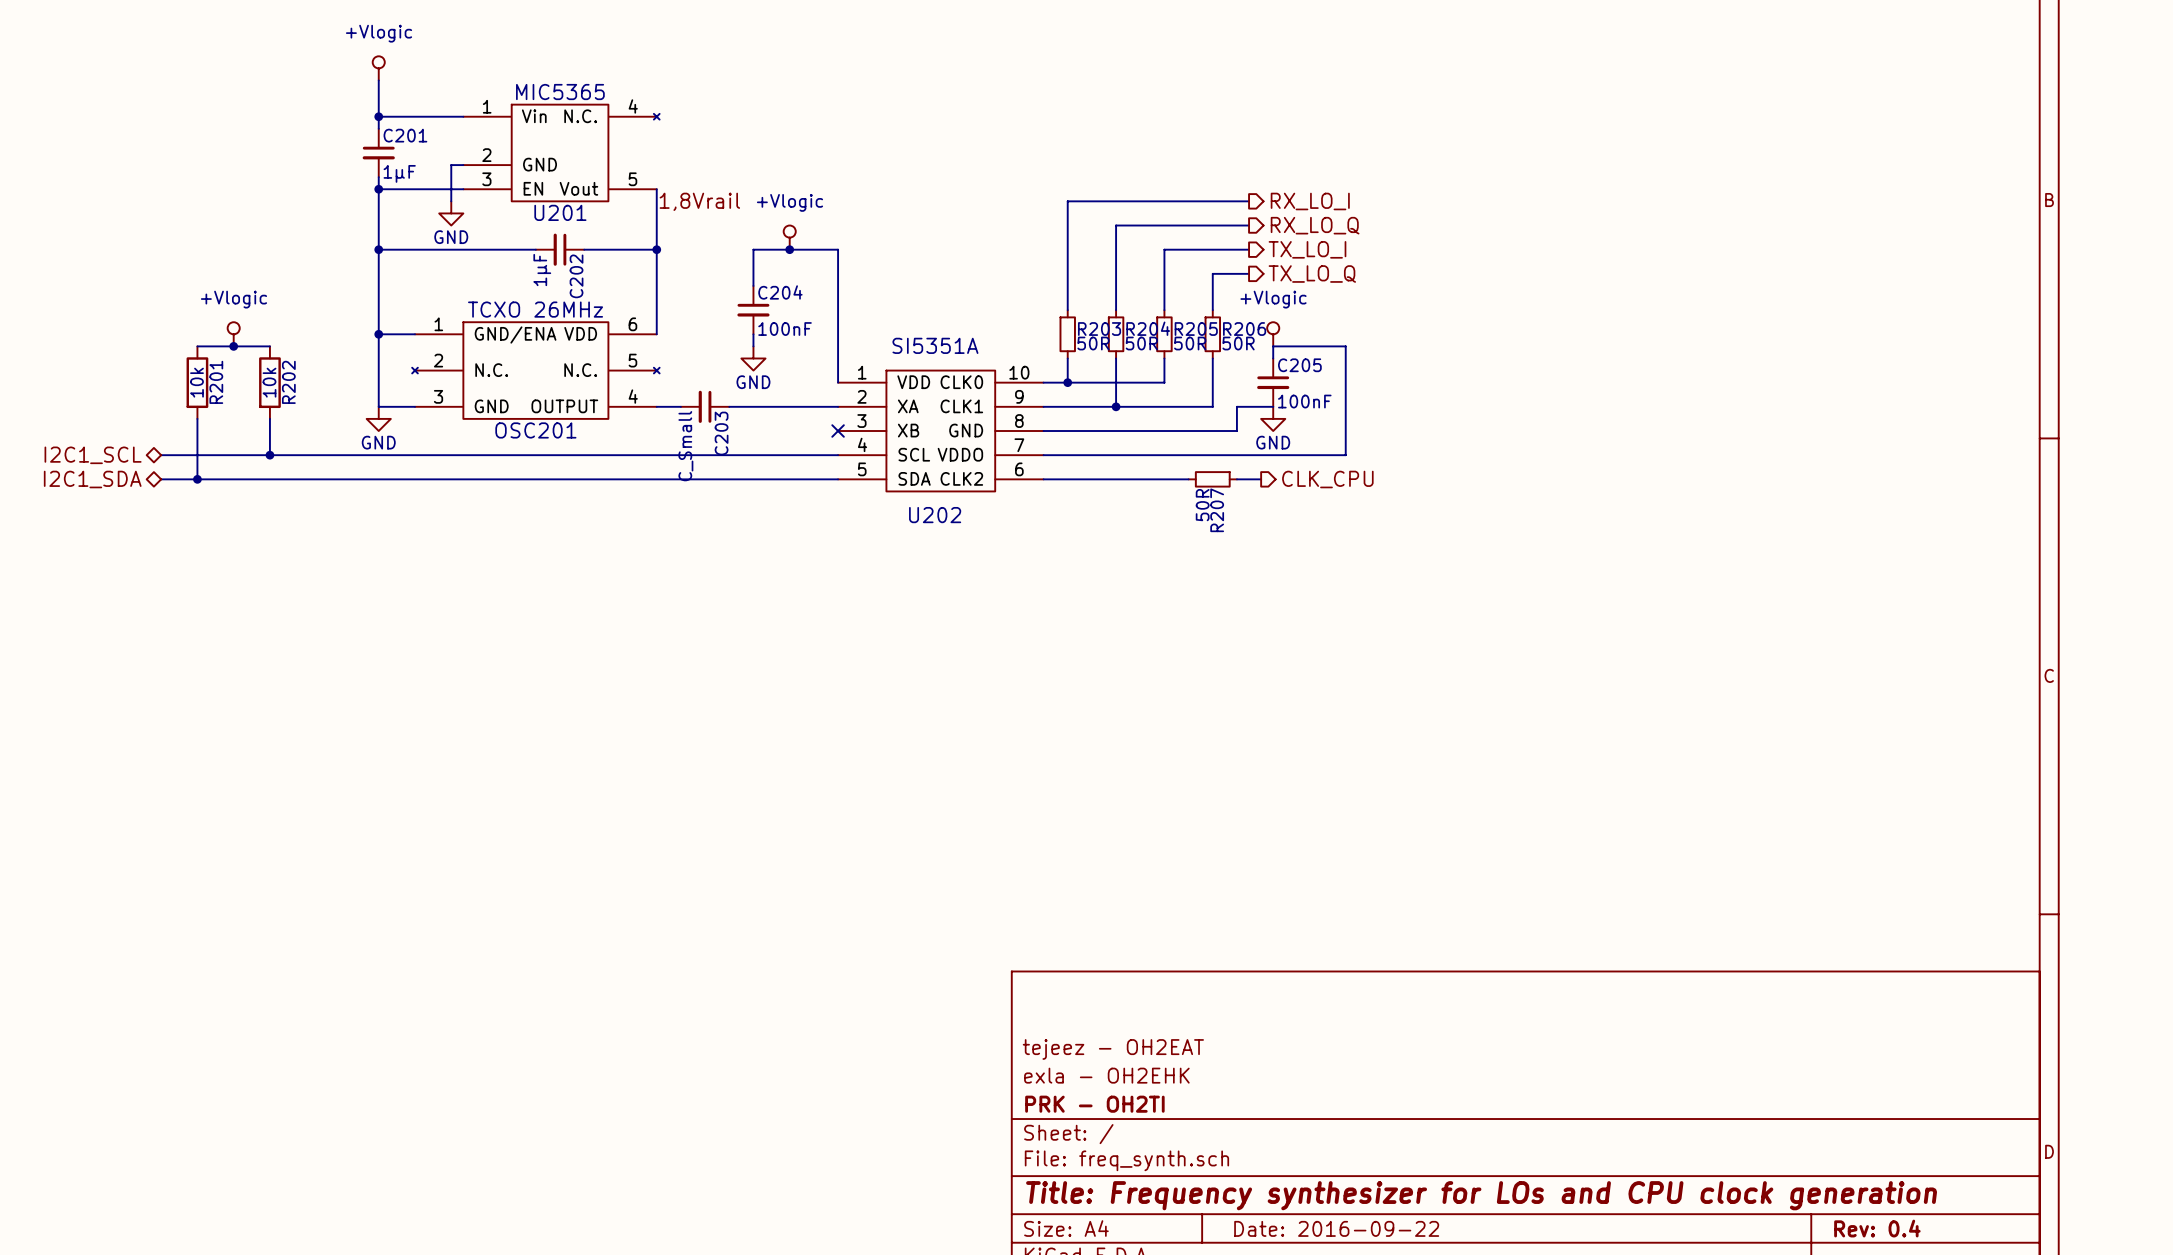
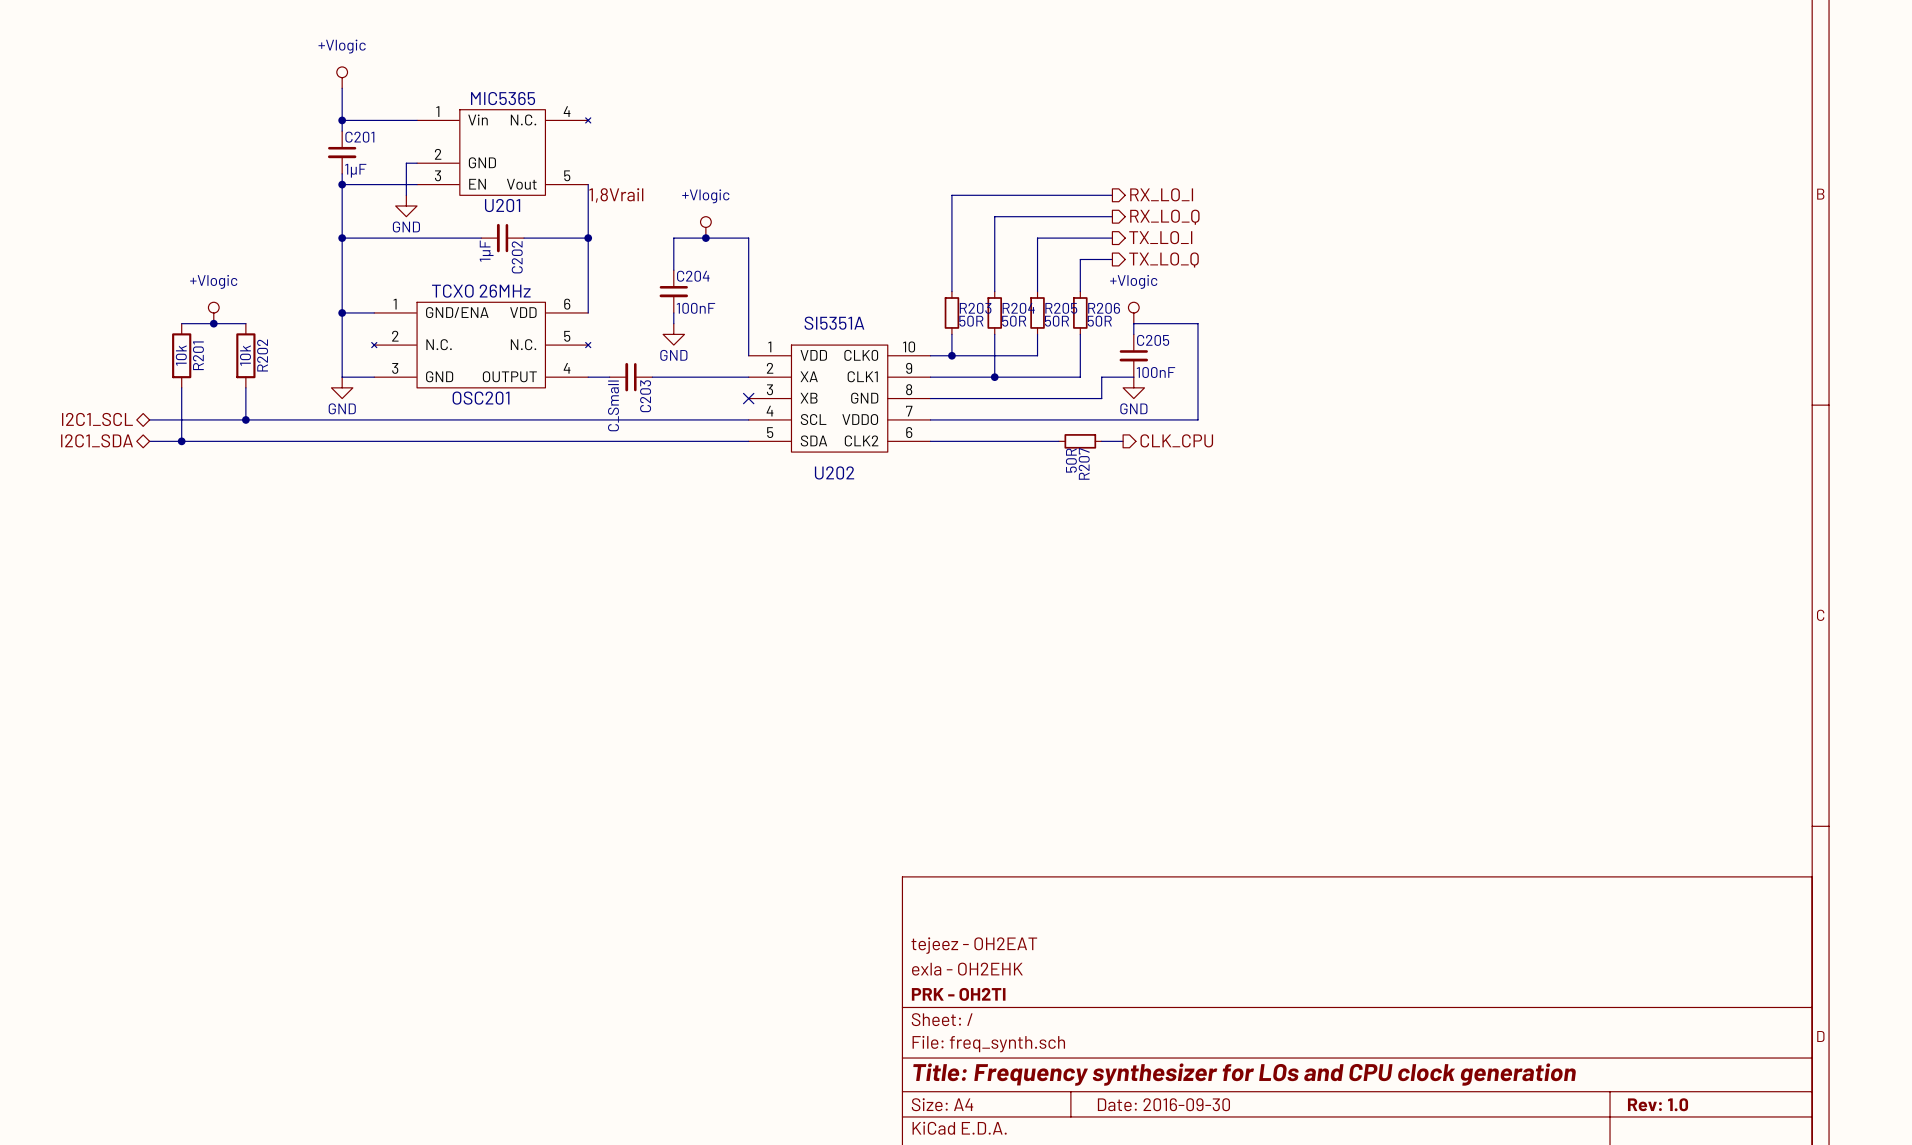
title block: Date: 2016-09-22 (1336, 1228) -> Date: 2016-09-30 (1163, 1104)
title block: Rev: 0.4 (1877, 1228) -> Rev: 1.0 (1658, 1104)

